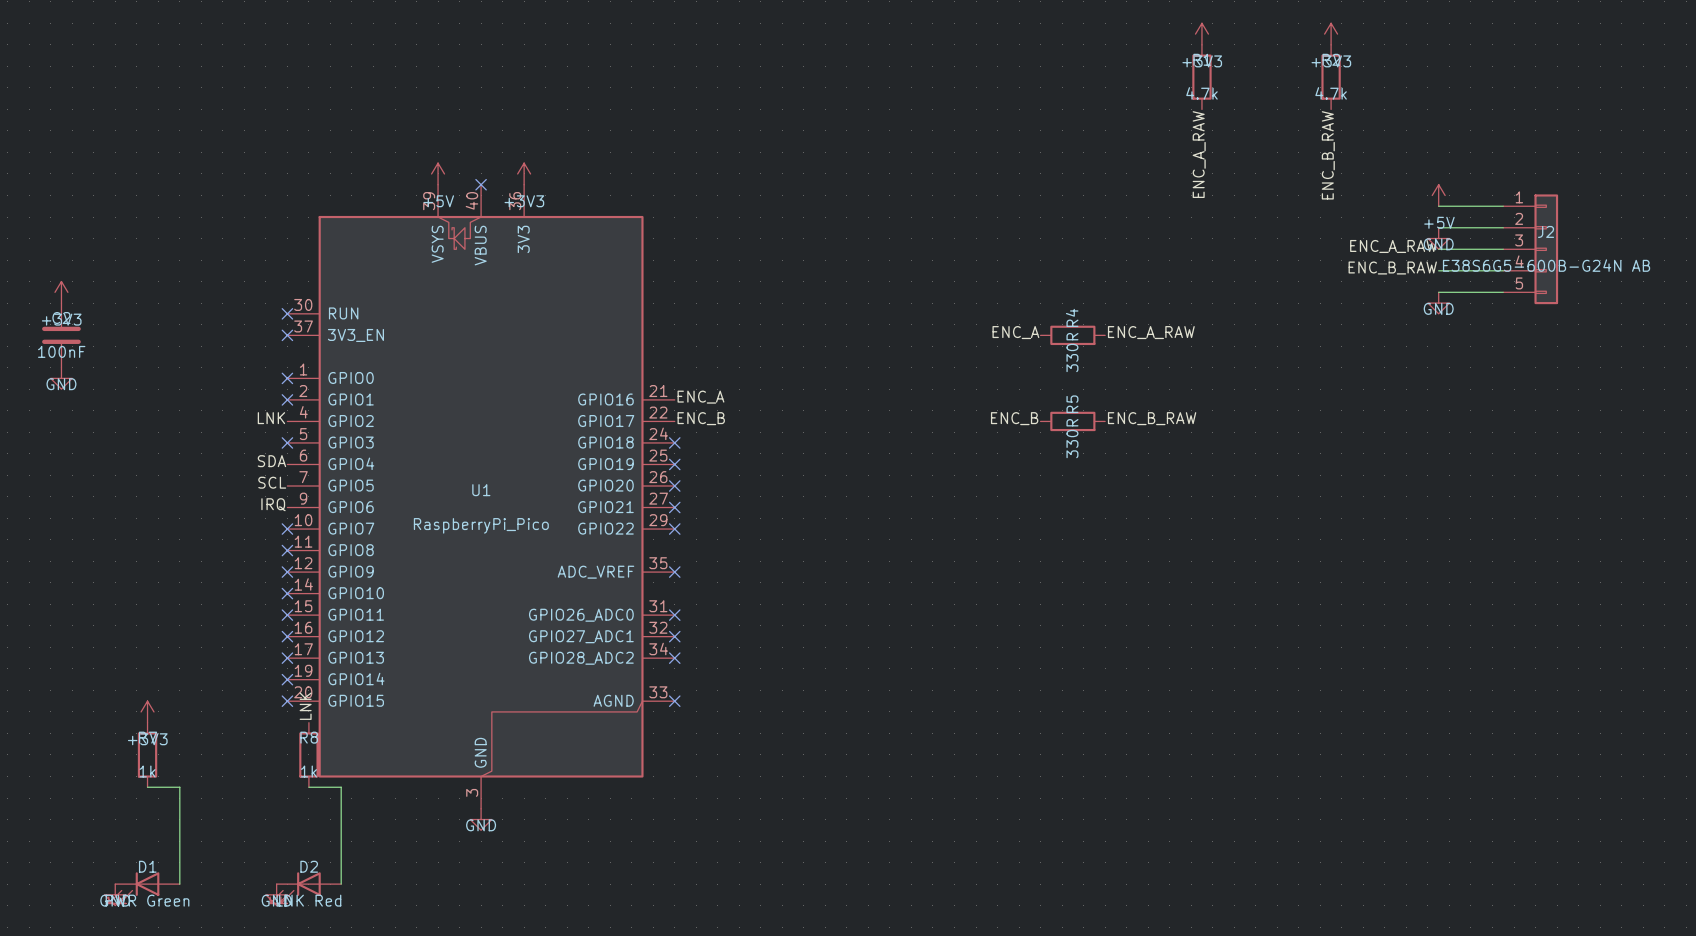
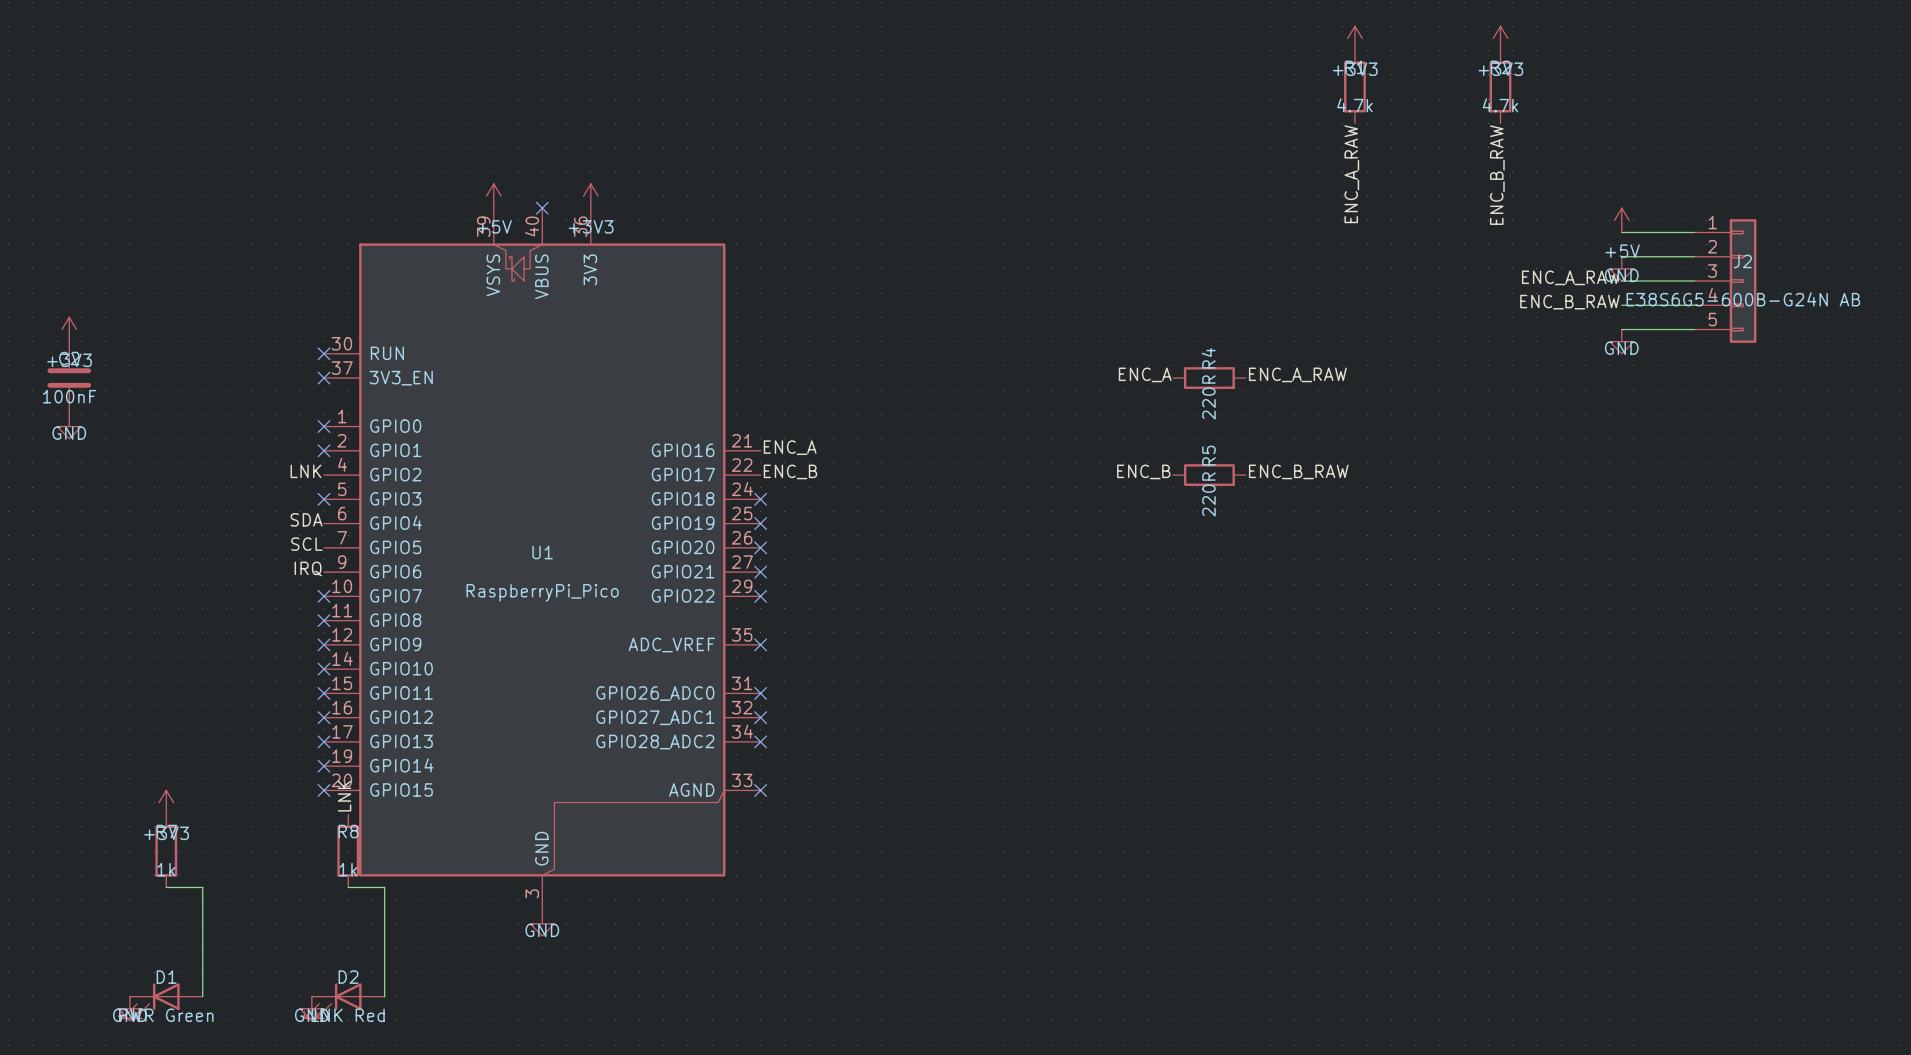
R4 value: 330R (1072, 352) -> 220R (1208, 397)
R5 value: 330R (1072, 438) -> 220R (1208, 494)

